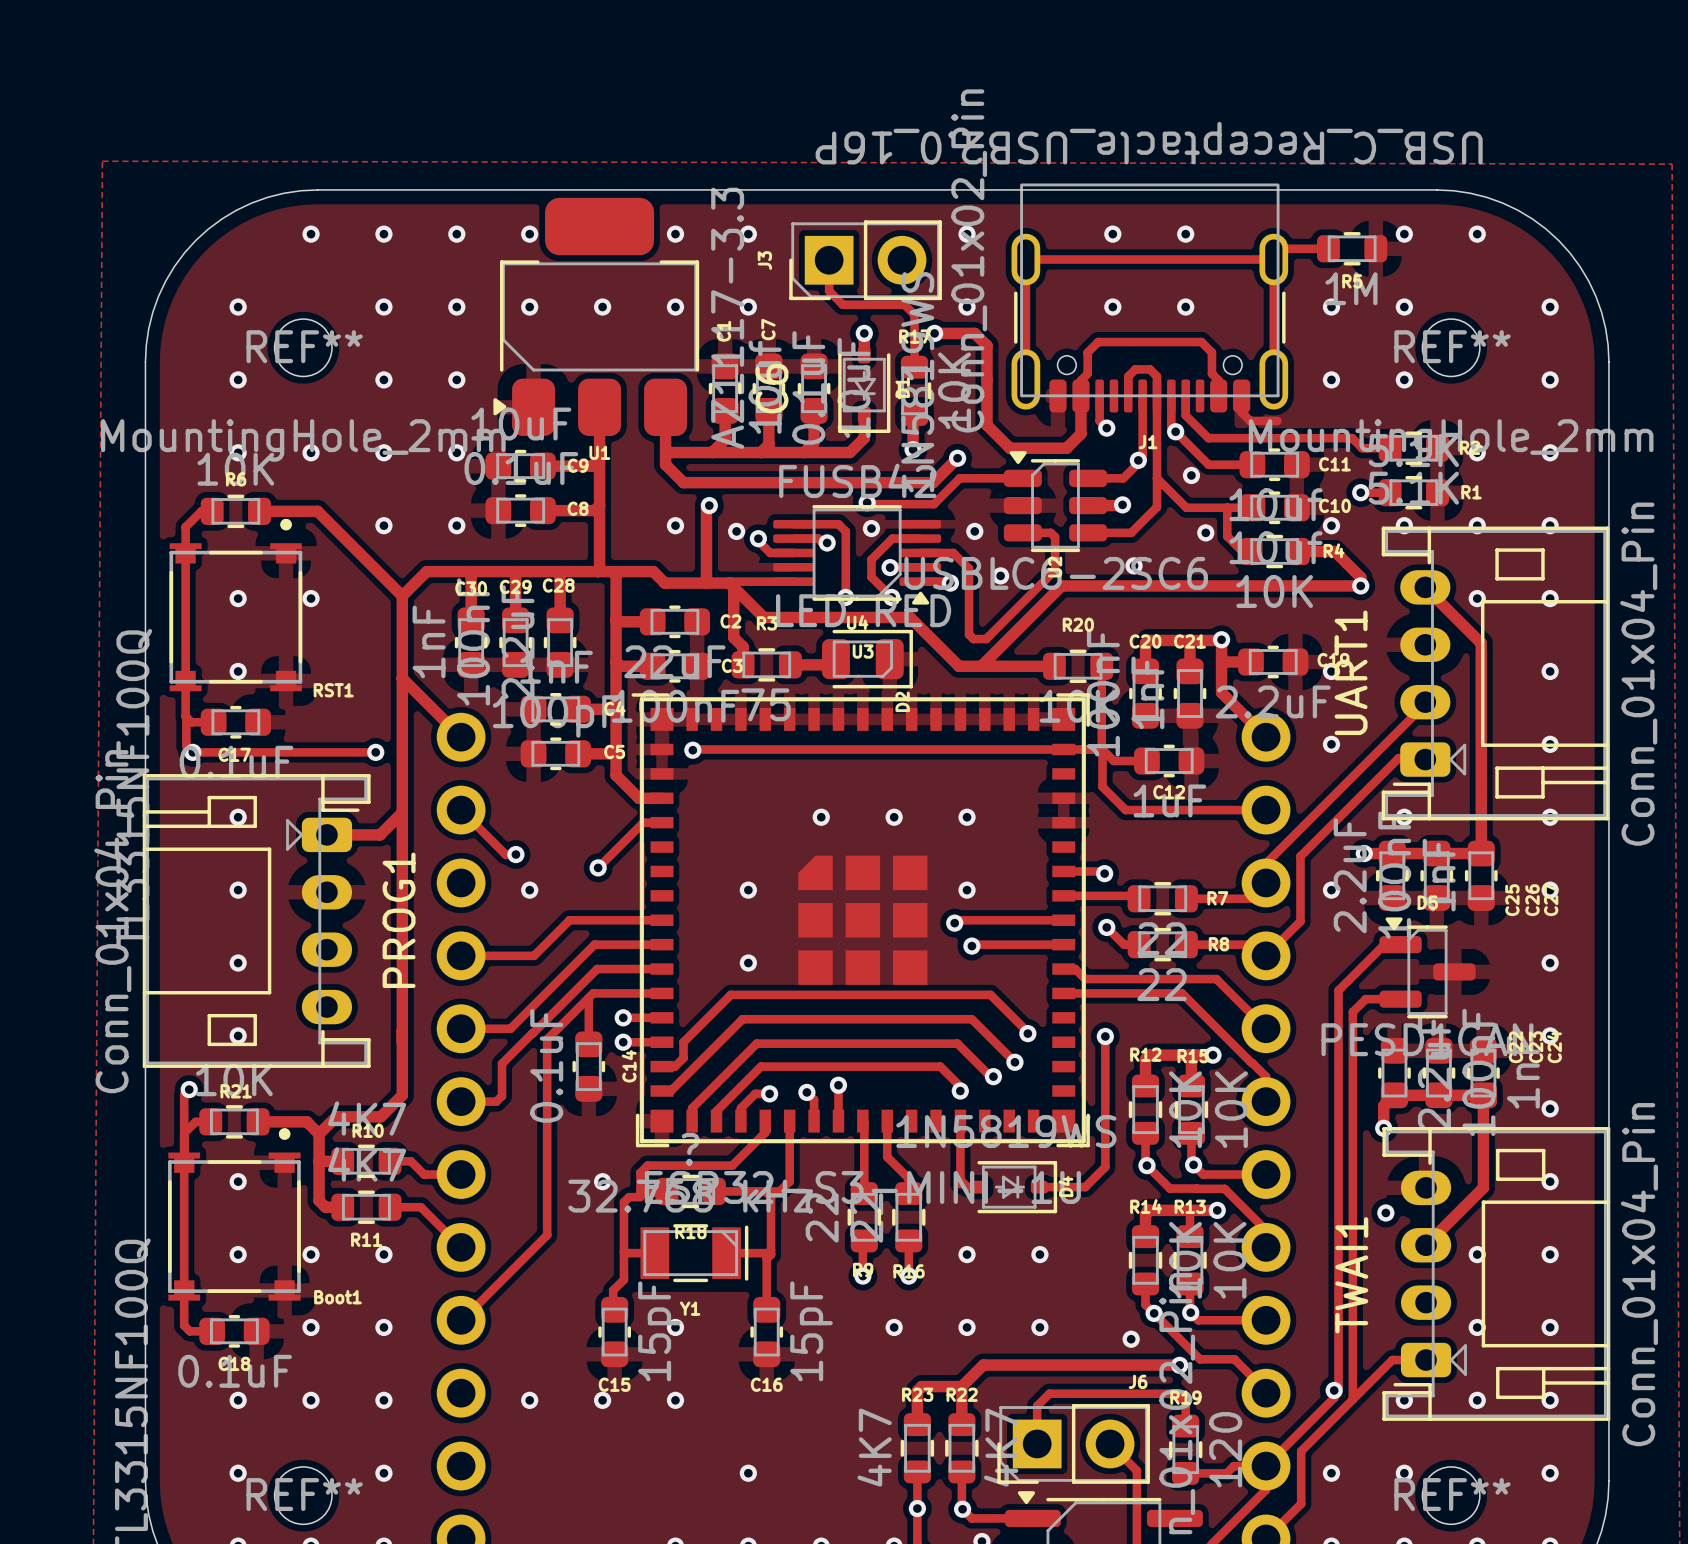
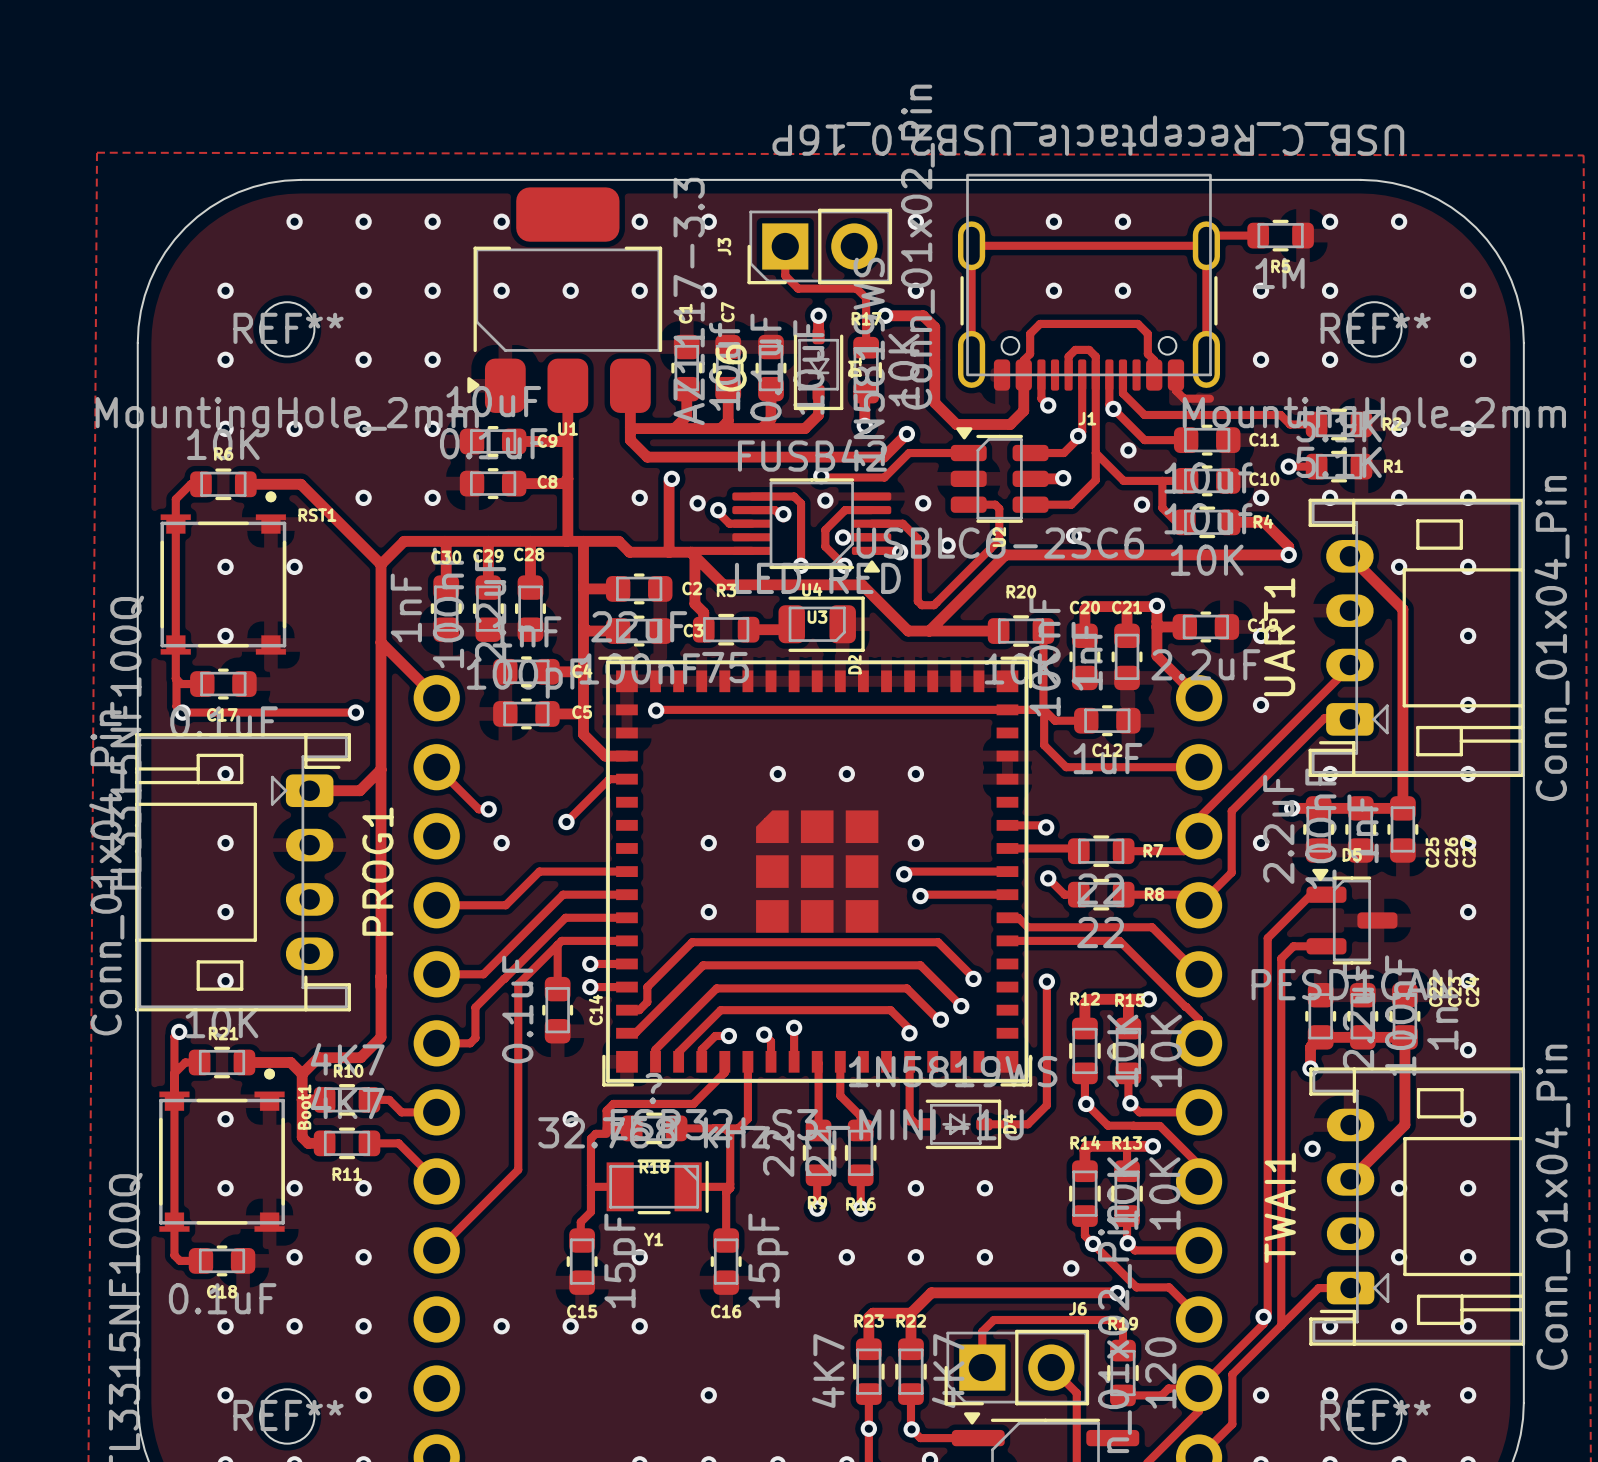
RST1 name position: RST1 (333, 690) -> RST1 (317, 515)
Boot1 name rotation: 0° (338, 1297) -> 90° counterclockwise (304, 1107)
Boot1 name position: Boot1 (338, 1297) -> Boot1 (304, 1107)

